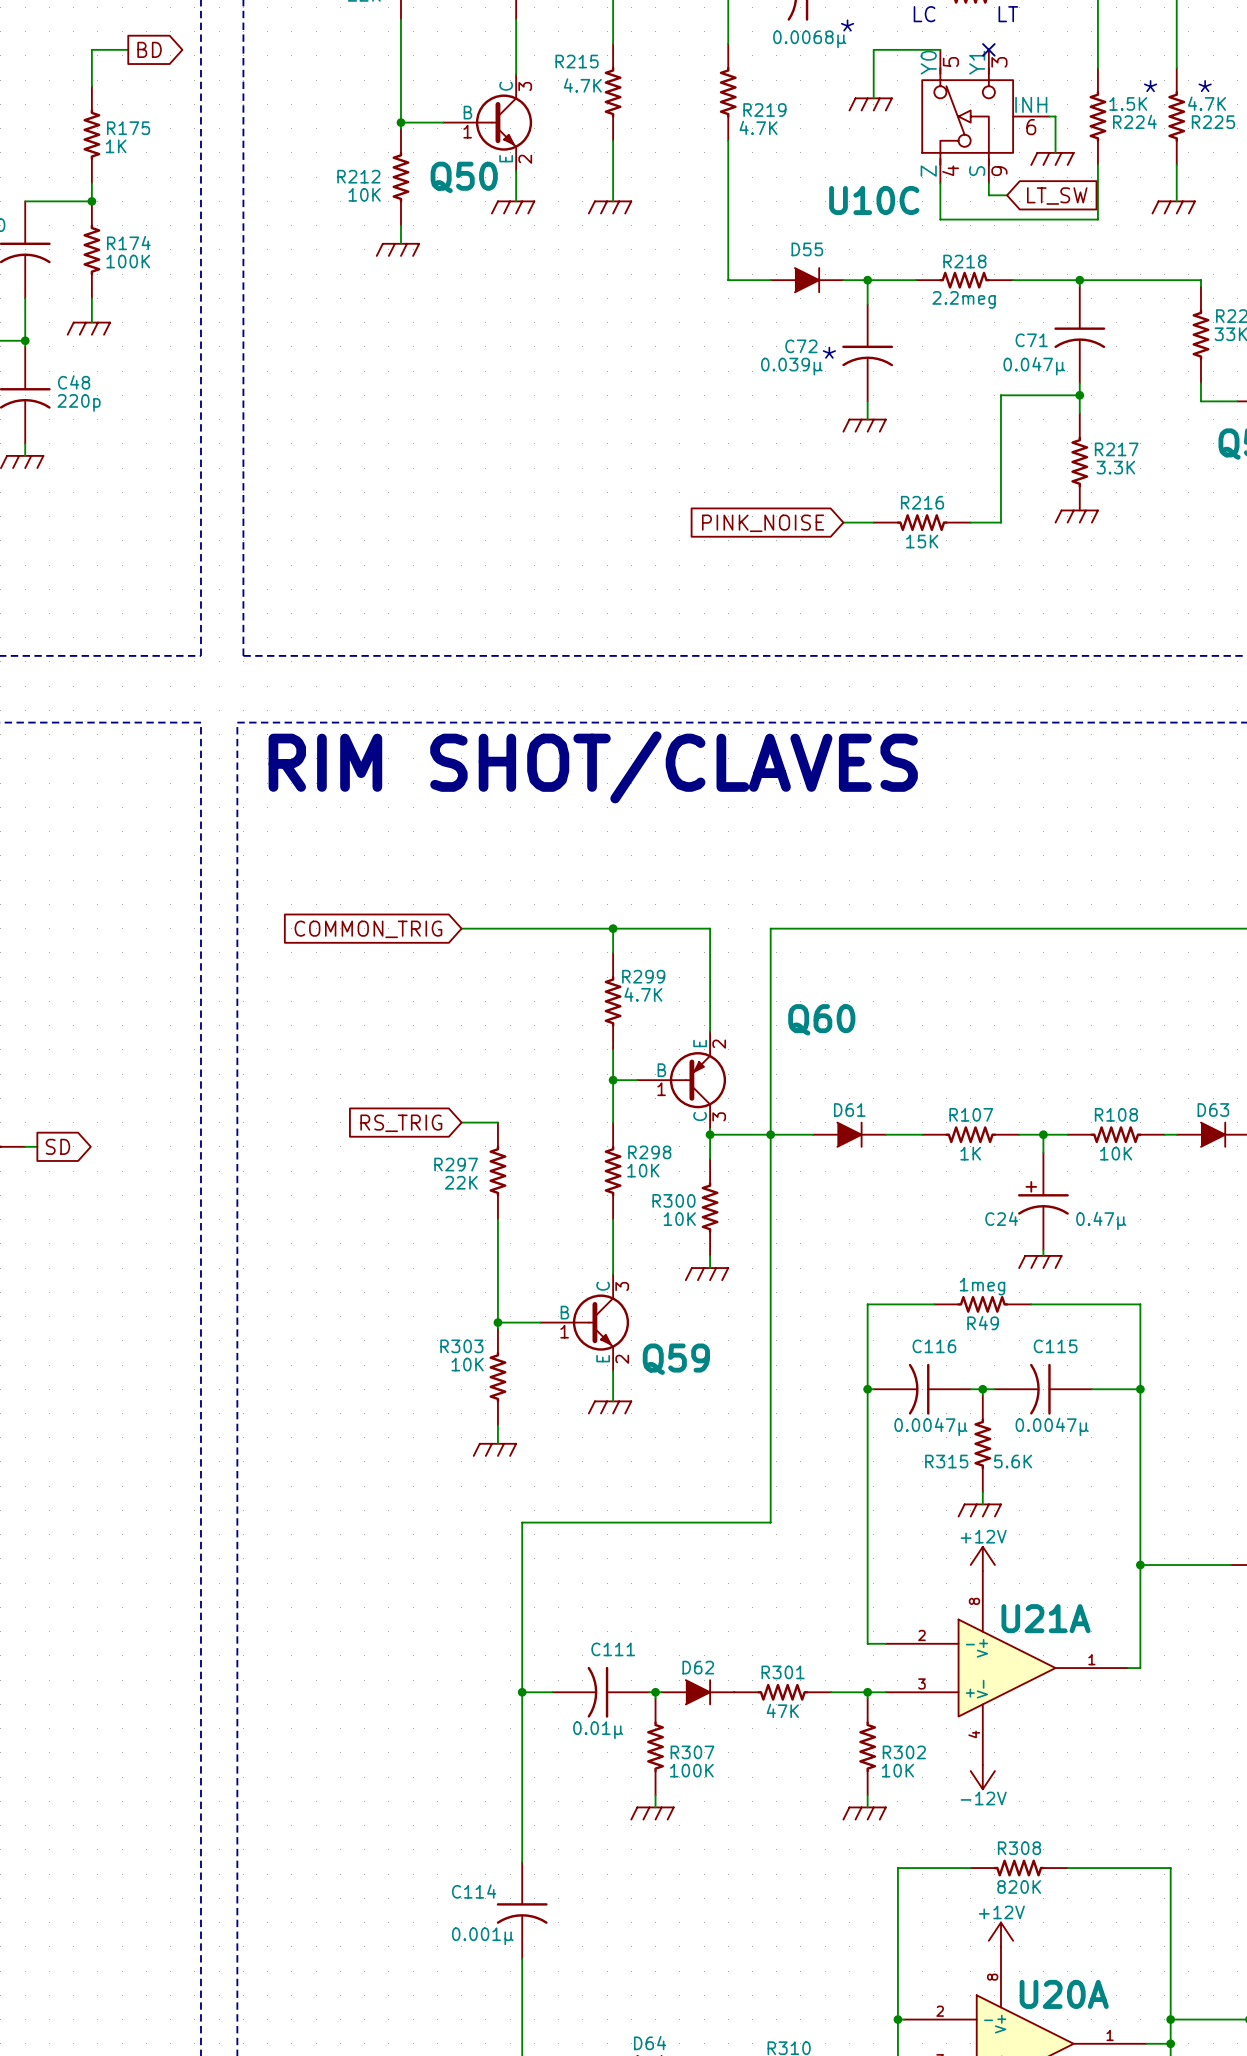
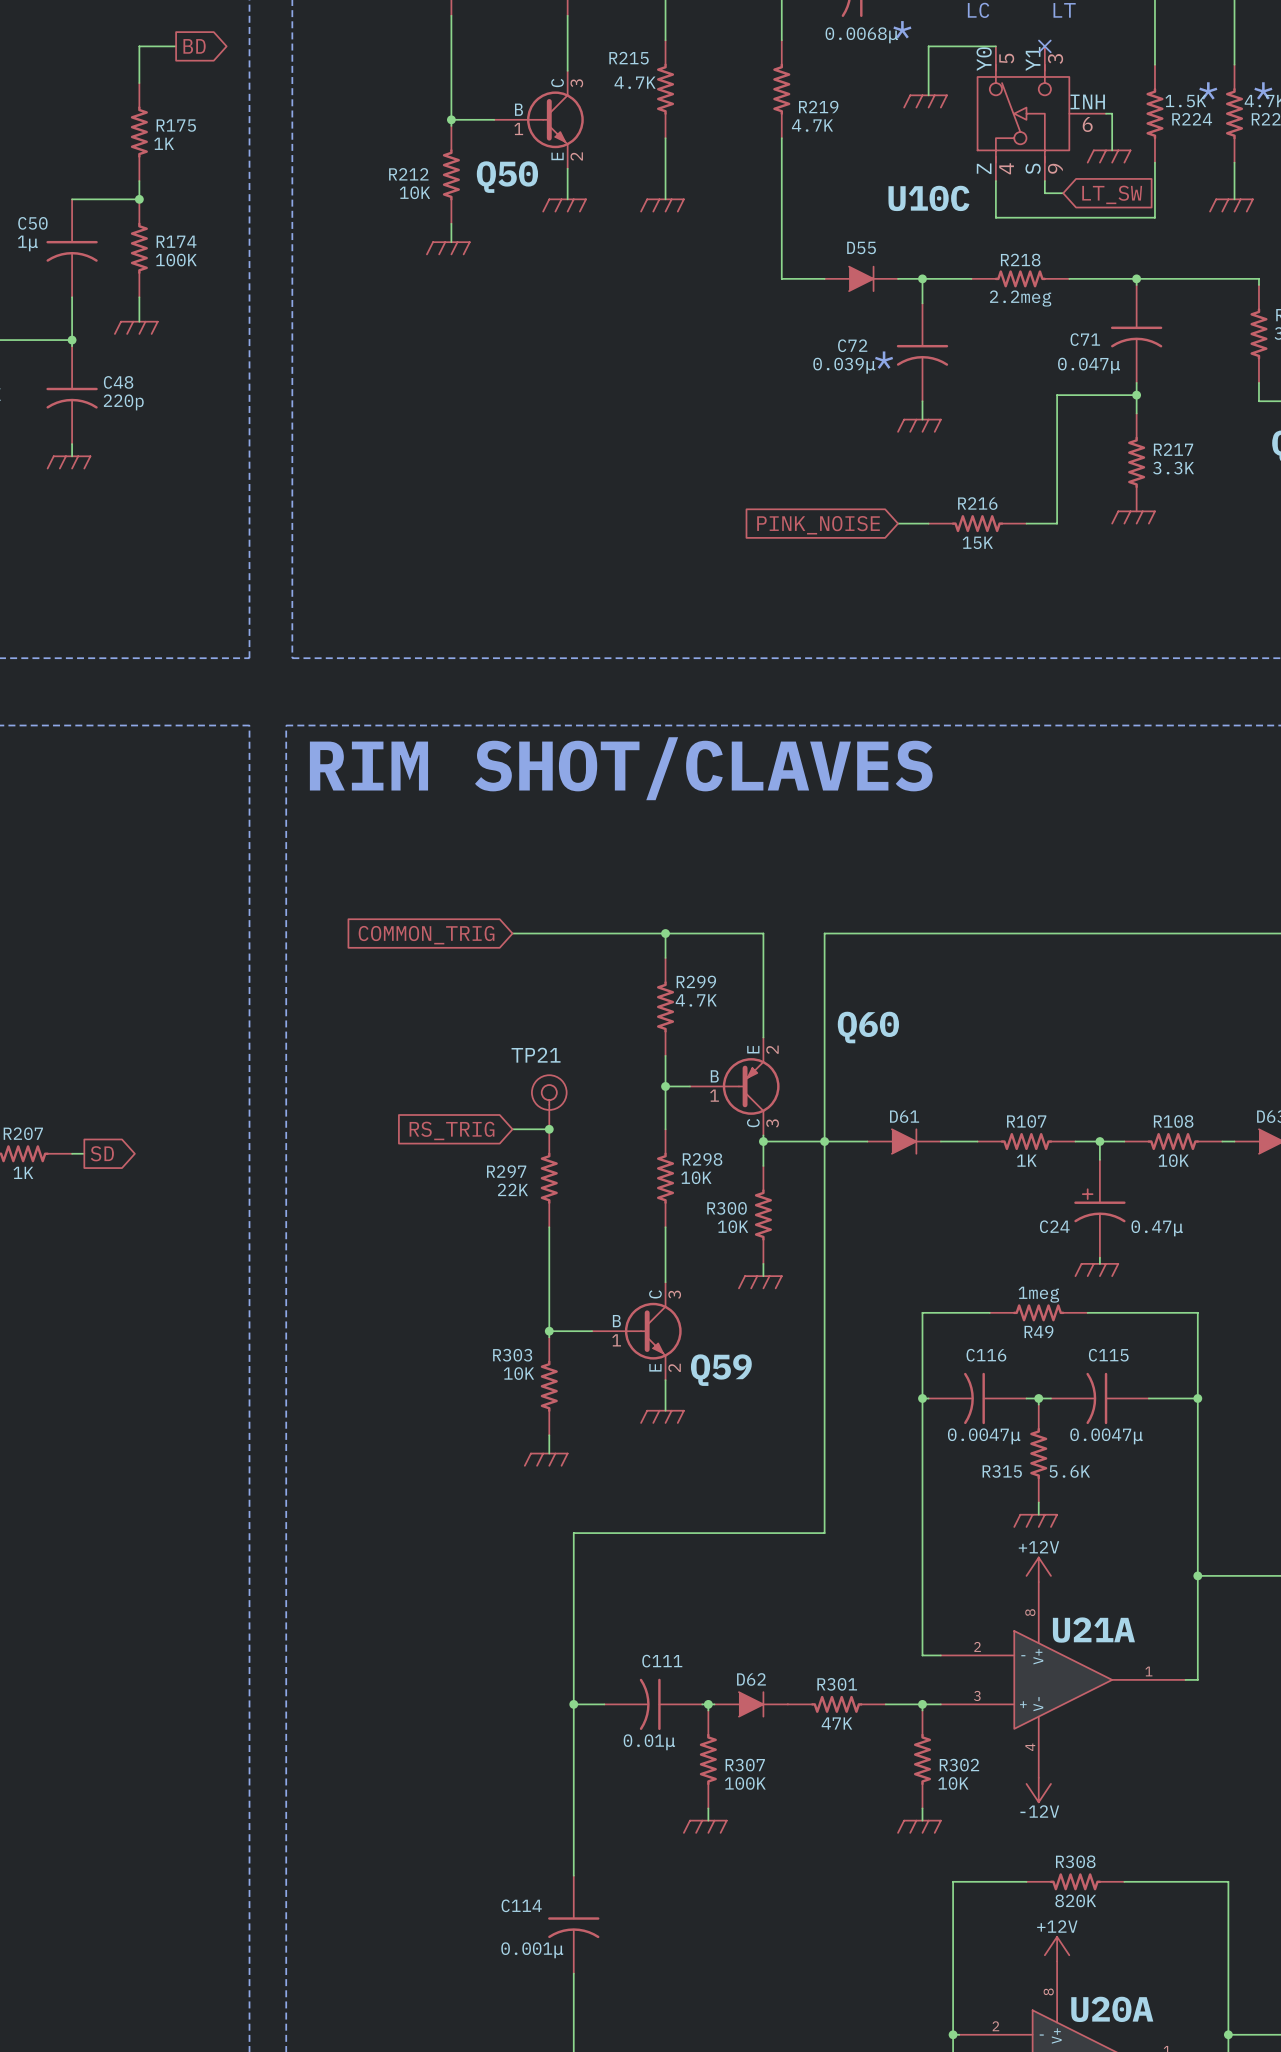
TP21: none -> (549, 1102)
junction: none -> (549, 1129)

